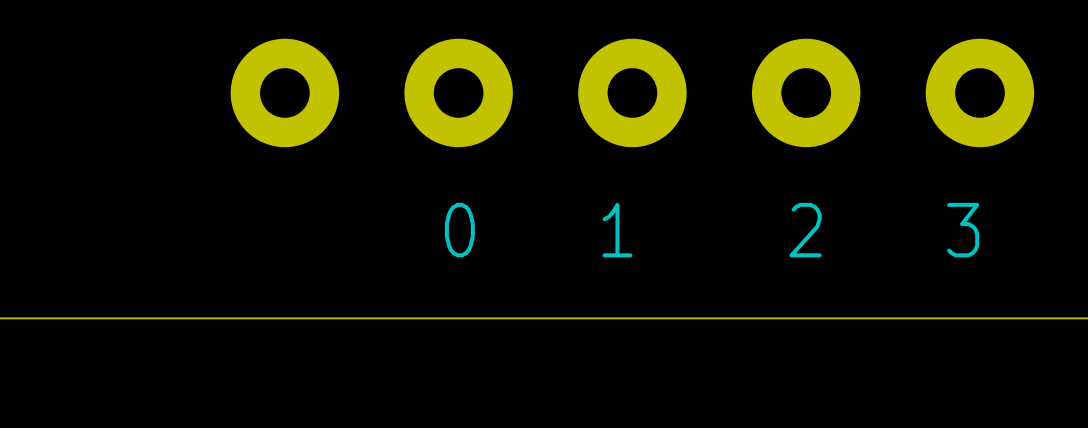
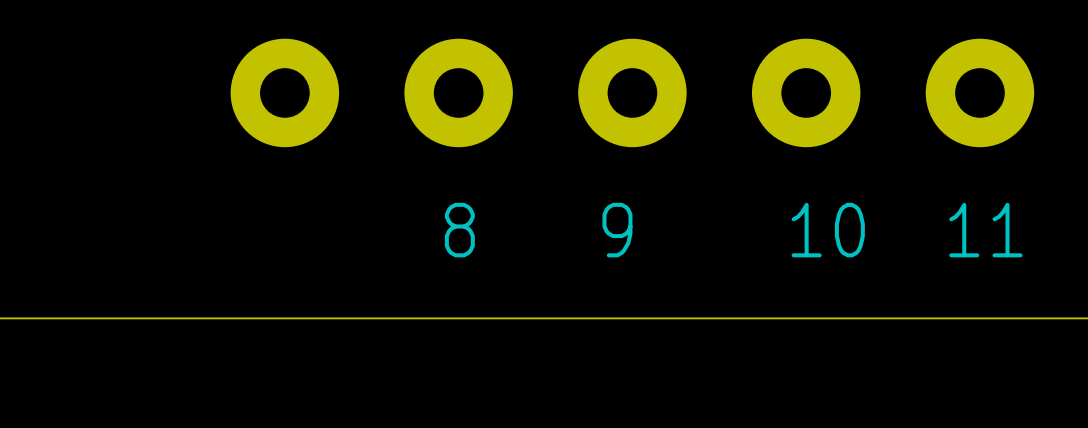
text: 0 (459, 230) -> 8 (459, 230)
text: 1 (617, 230) -> 9 (617, 230)
text: 2 (805, 230) -> 10 (828, 230)
text: 3 (963, 230) -> 11 (985, 230)

